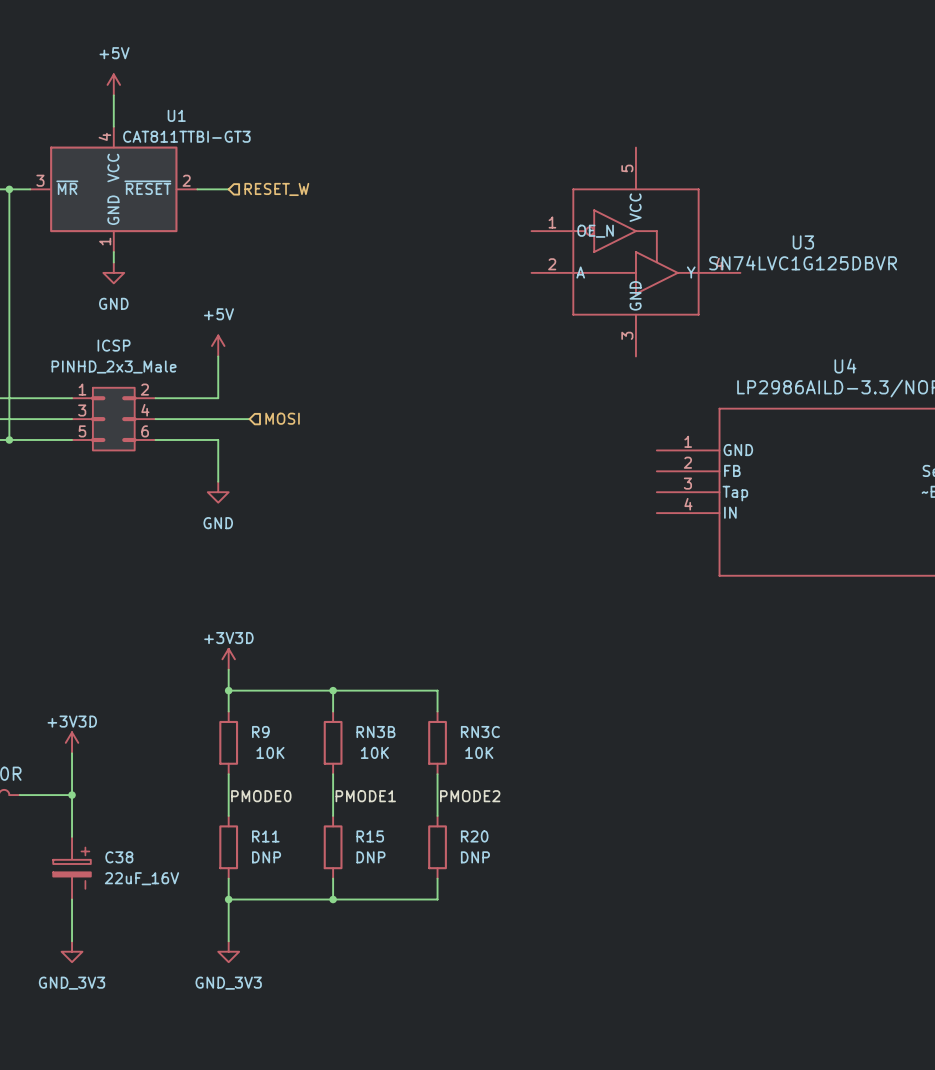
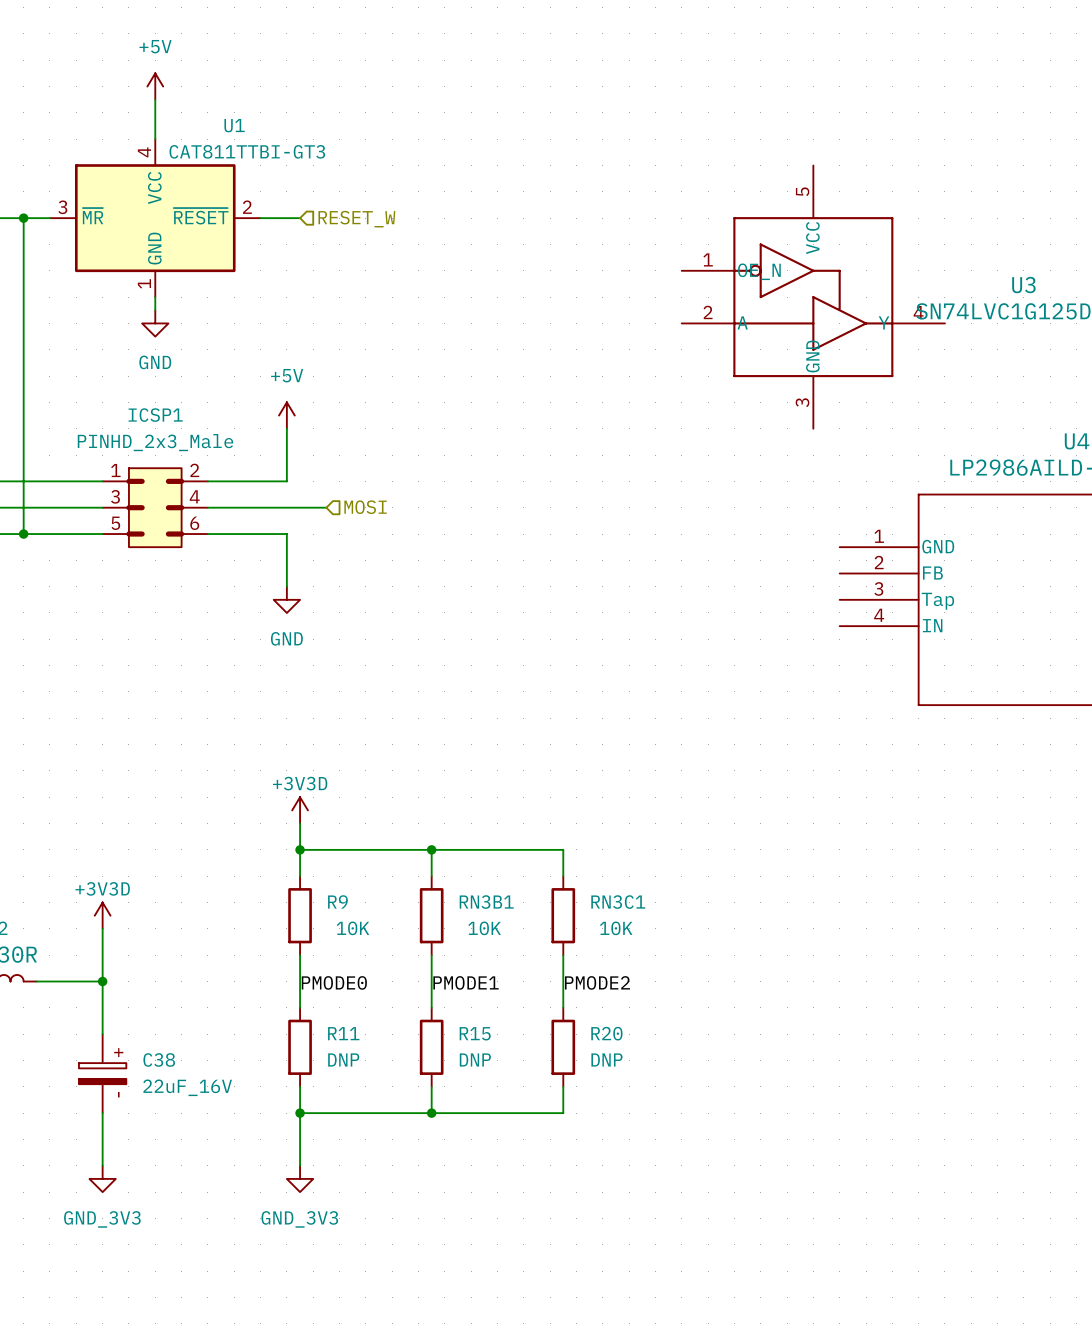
ICSP name: ICSP (114, 345) -> ICSP1 (155, 415)
RN3B name: RN3B (375, 732) -> RN3B1 (486, 902)
RN3C name: RN3C (480, 732) -> RN3C1 (618, 902)

